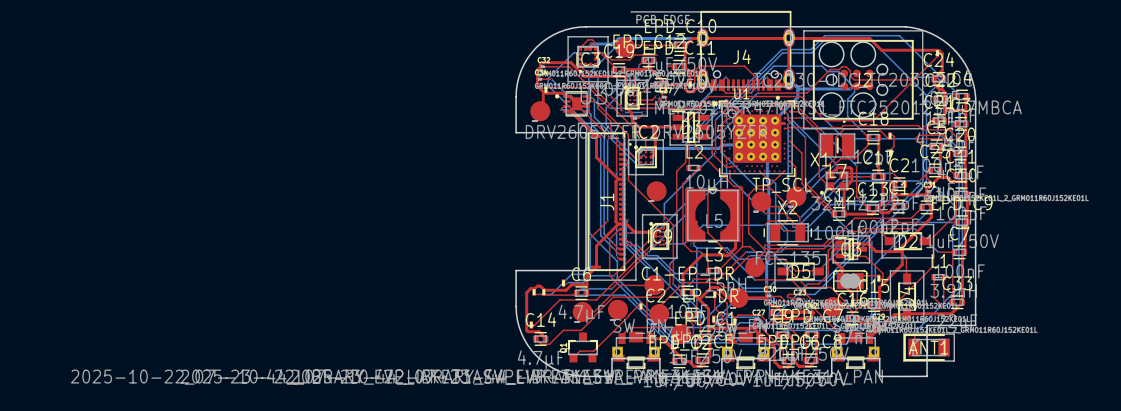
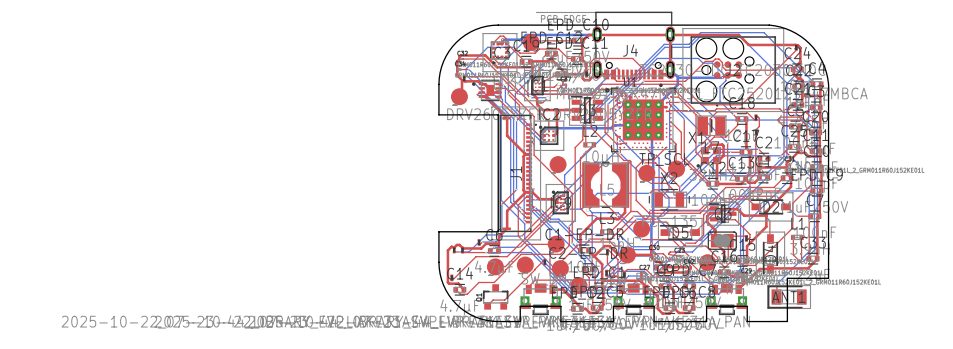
top track: none -> (558, 49) (568, 58)

